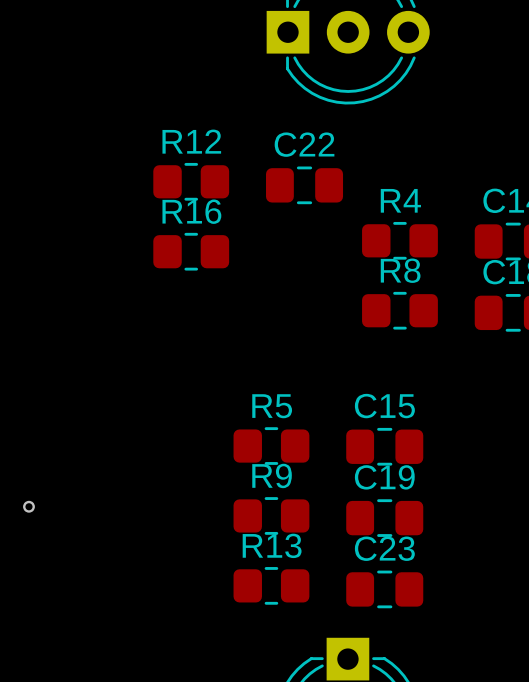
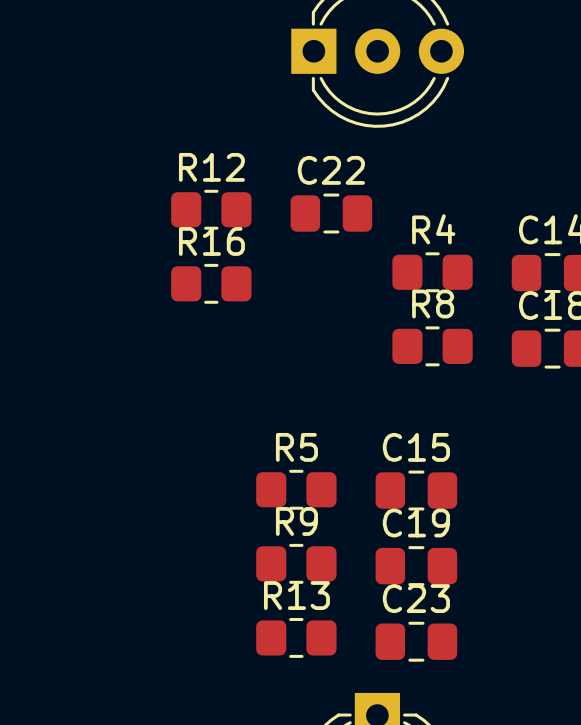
via: (28, 506) -> none

